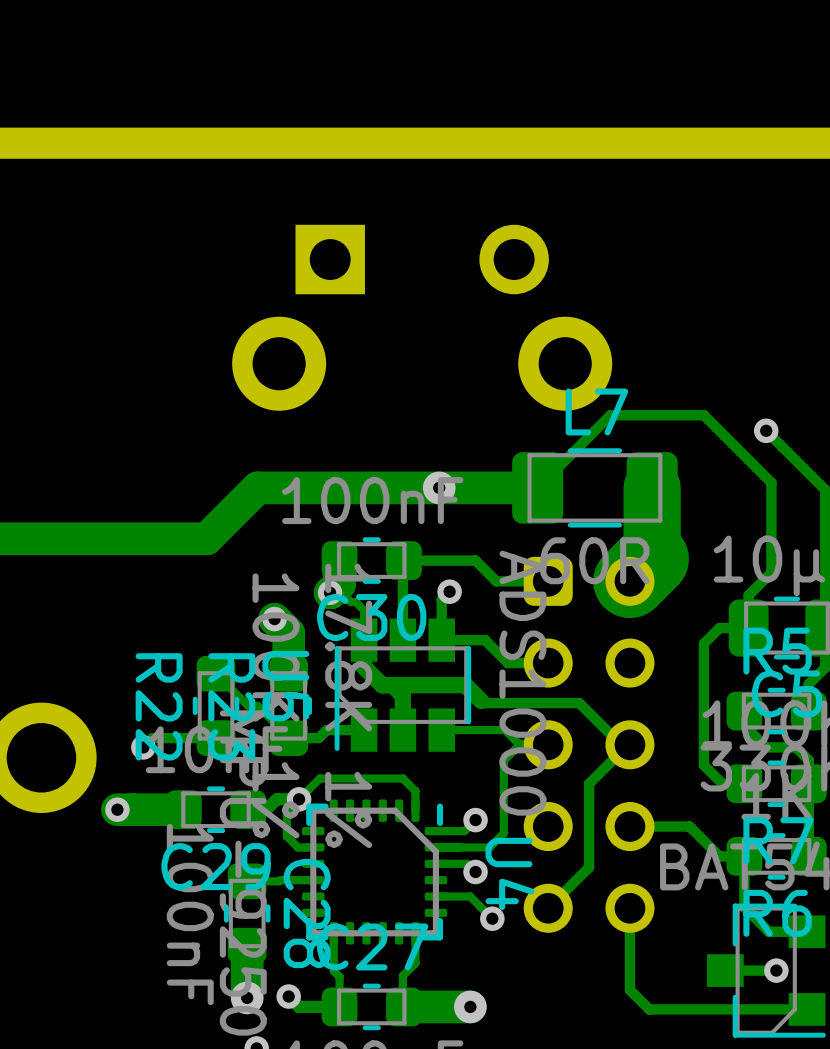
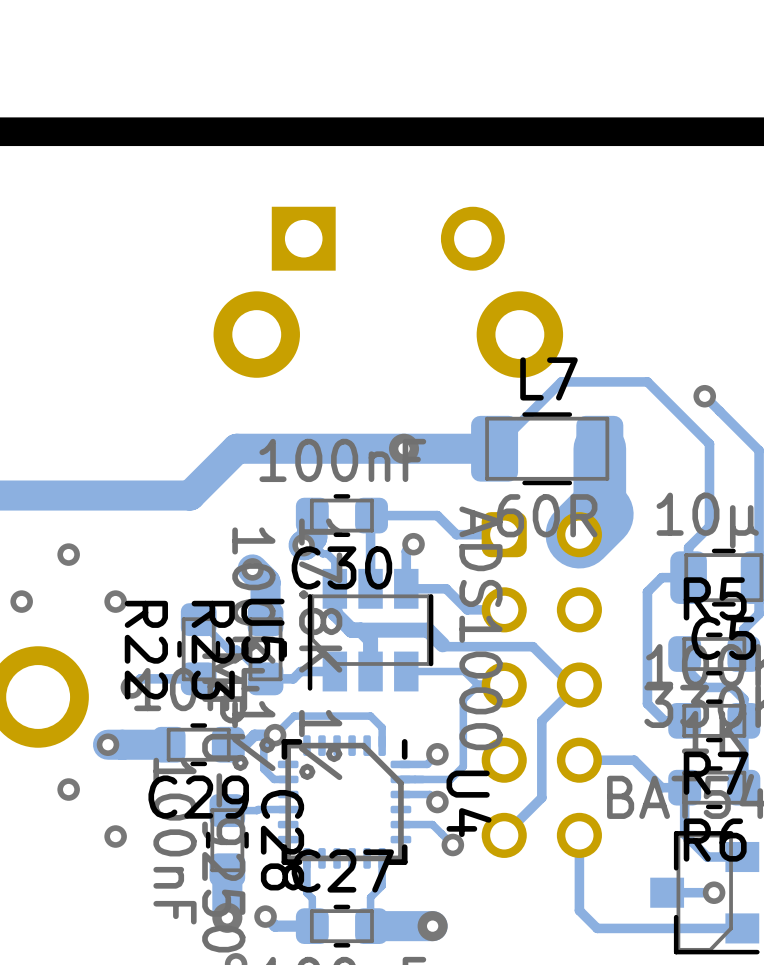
via: none -> (68, 554)
via: none -> (21, 601)
via: none -> (115, 601)
via: none -> (68, 789)
via: none -> (115, 836)

